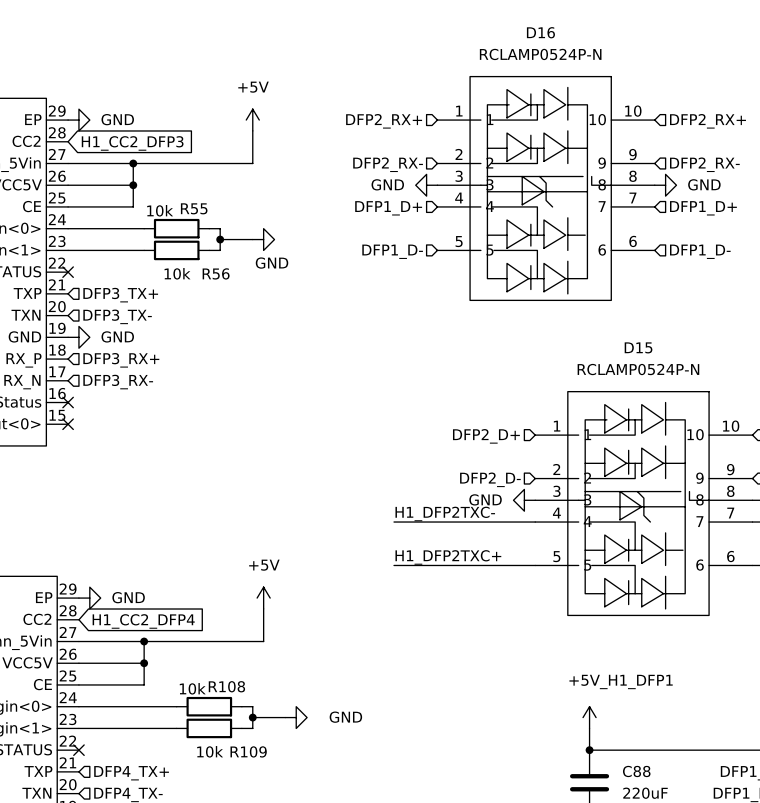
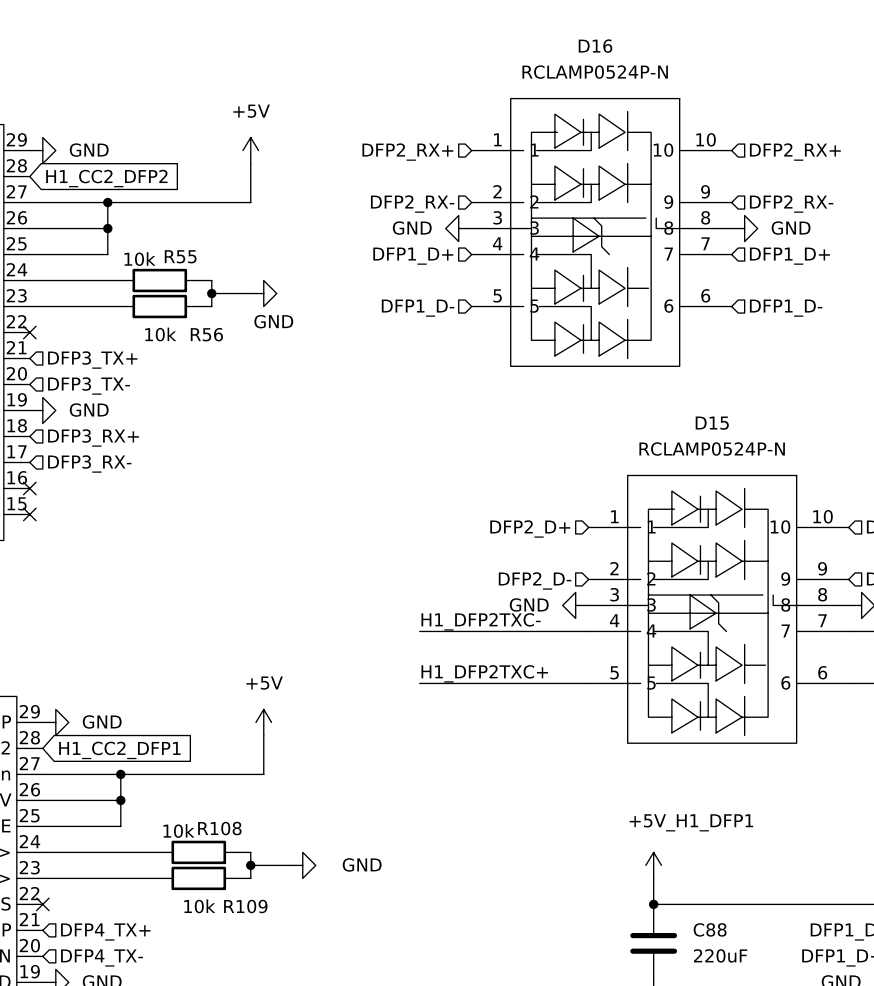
global label: H1_CC2_DFP3 (132, 143) -> H1_CC2_DFP2 (106, 178)
global label: H1_CC2_DFP4 (143, 621) -> H1_CC2_DFP1 (119, 750)

